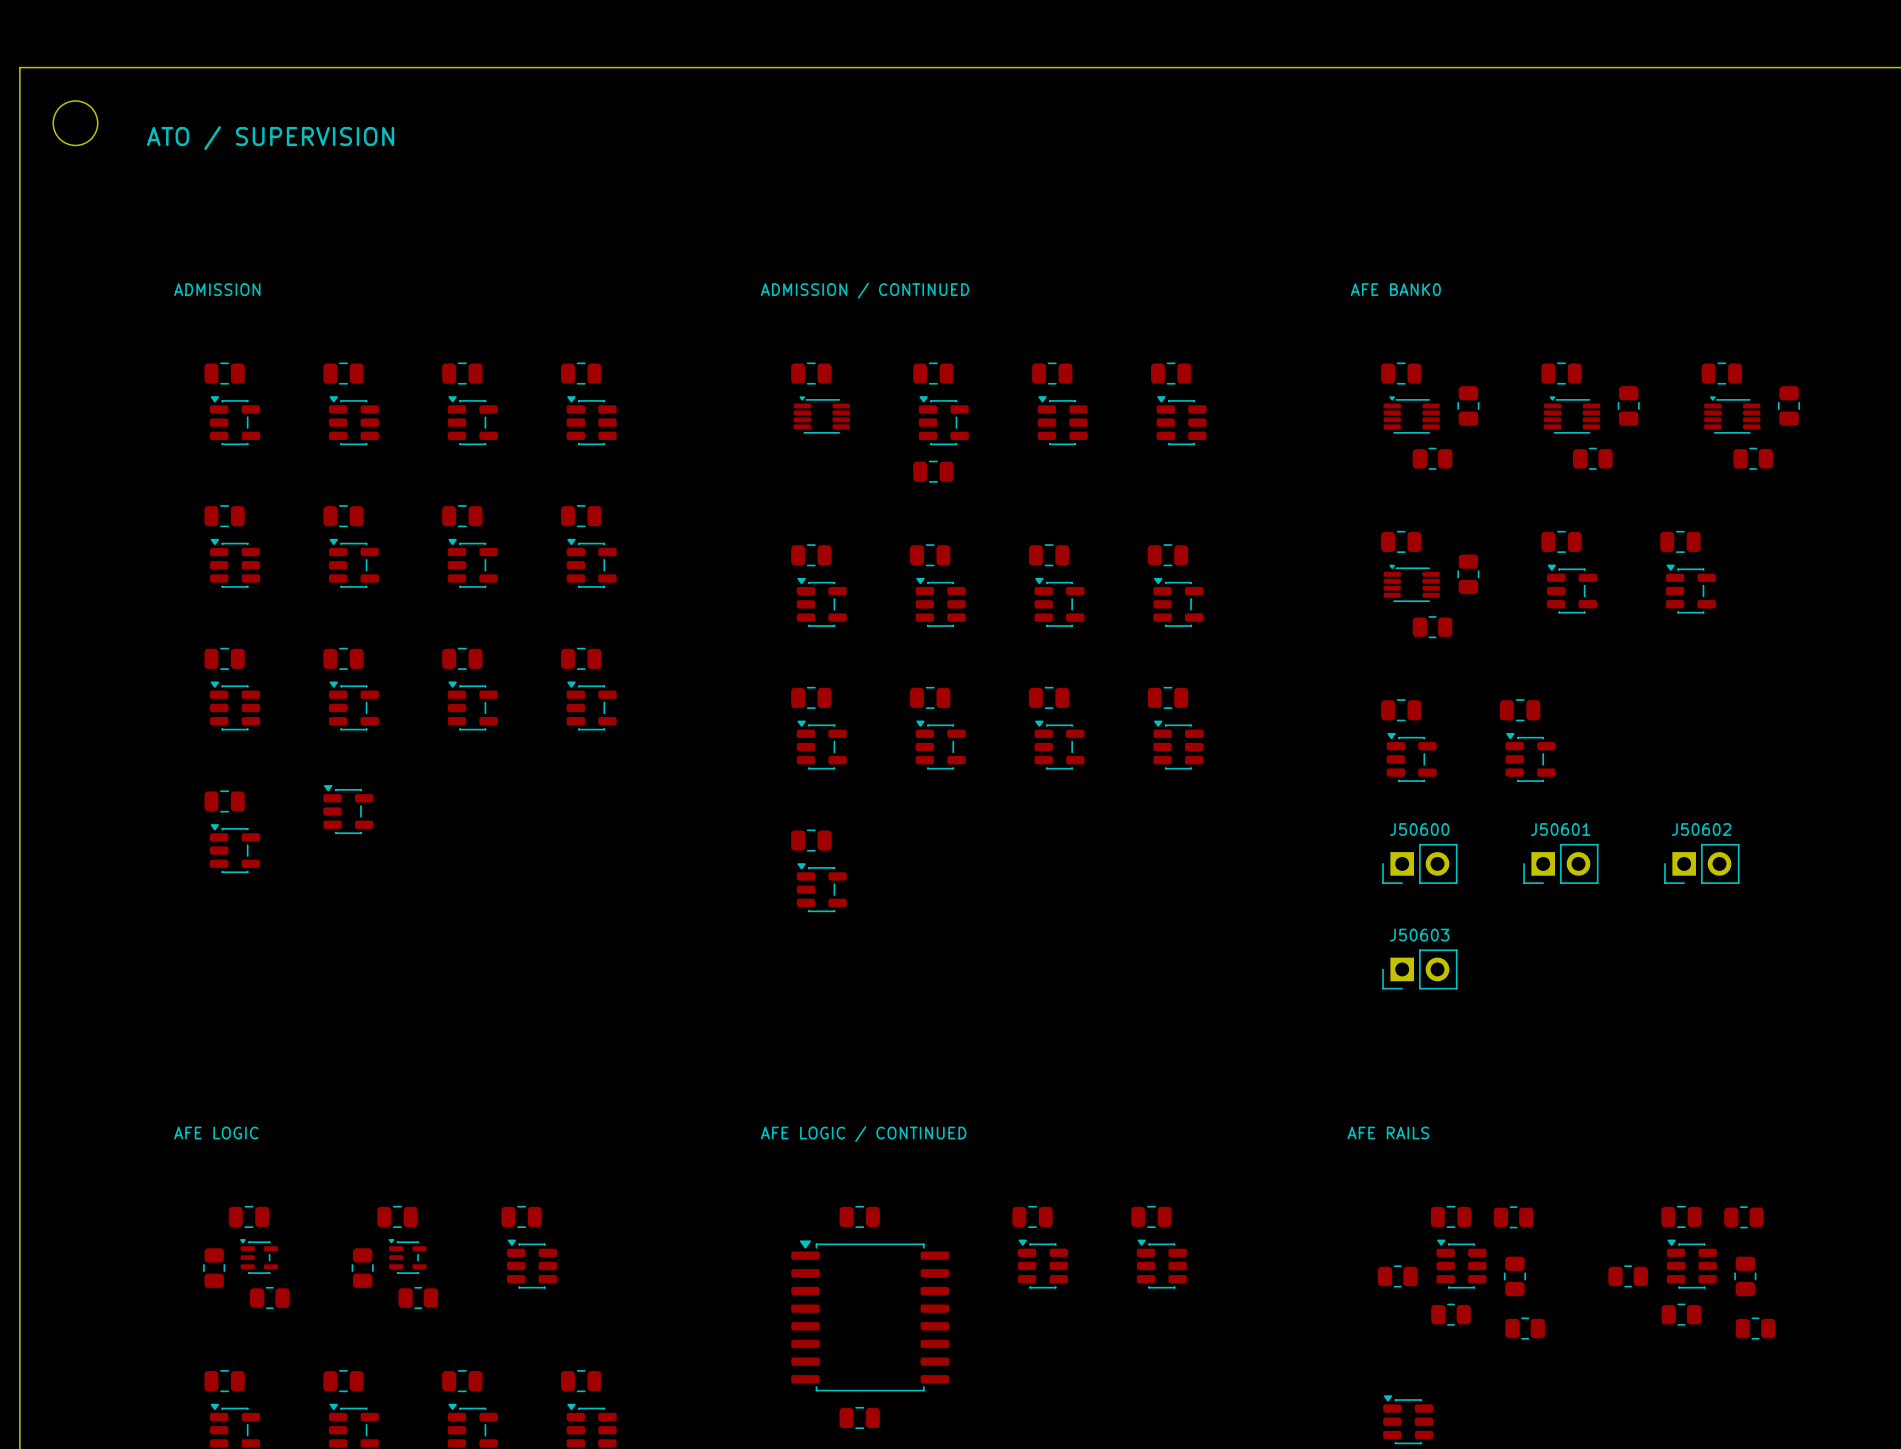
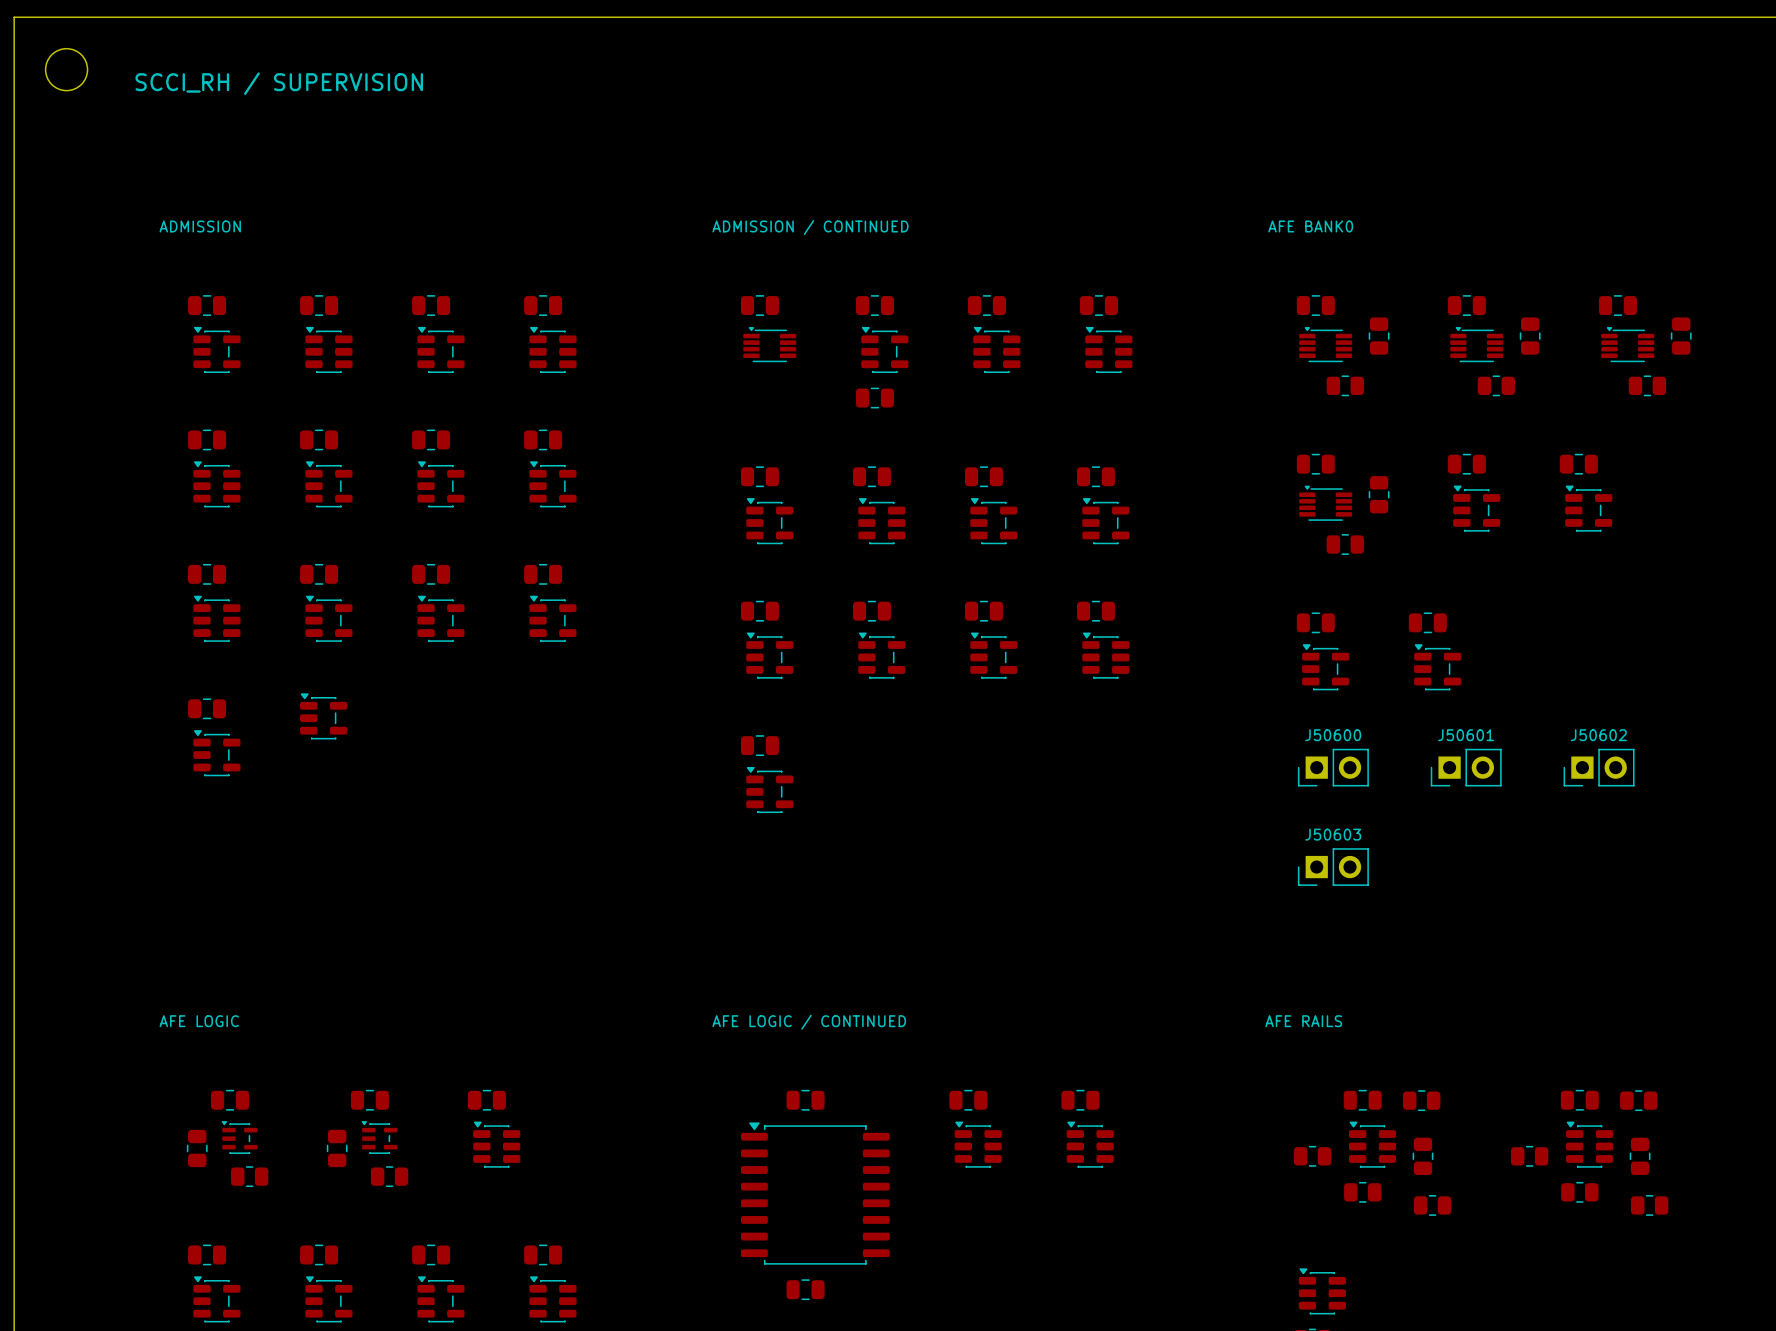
text: ATO / SUPERVISION (270, 138) -> SCCI_RH / SUPERVISION (279, 83)

